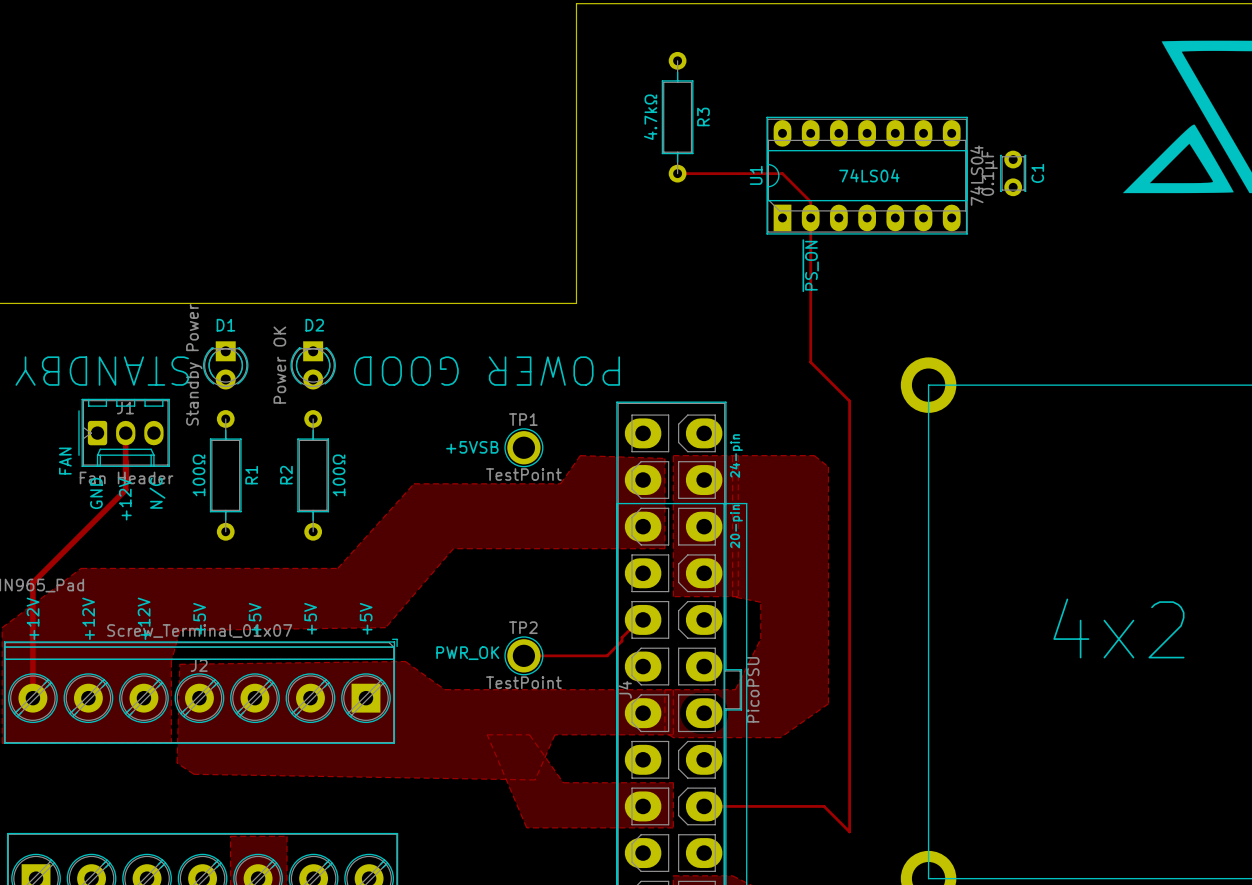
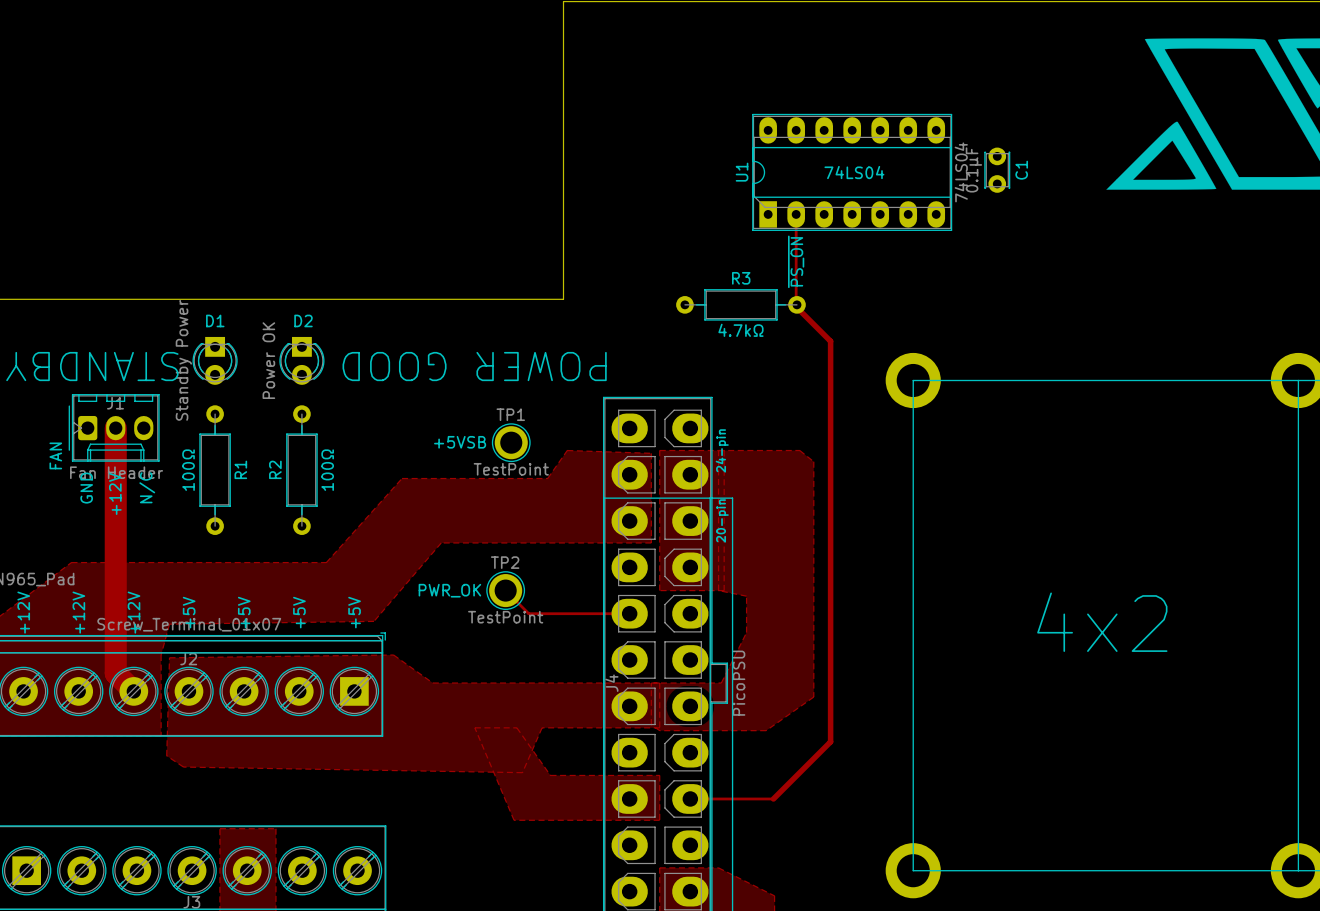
R3 name position: R3 (703, 116) -> R3 (741, 278)
R3 value position: 4.7kΩ (650, 117) -> 4.7kΩ (740, 330)
R3 rotation: 0° (677, 117) -> 90° clockwise (740, 304)
R3 position: (677, 117) -> (740, 304)
track: (677, 173) (782, 173) (810, 201) (810, 217) -> none
track: (810, 310) (810, 362) (849, 401) (849, 831) (824, 806) (787, 806) -> (796, 306) (830, 341) (830, 741) (773, 798)
track width: thin (125, 433) (125, 489) -> thick (115, 428) (115, 484)
track: (125, 489) (32, 582) (32, 698) -> (115, 484) (115, 673) (133, 691)
track: (639, 619) (607, 655) (523, 655) (525, 654) -> (626, 613) (528, 613) (505, 590)
text position: PWR_OK (467, 653) -> PWR_OK (449, 590)
TP2 position: (523, 655) -> (505, 590)

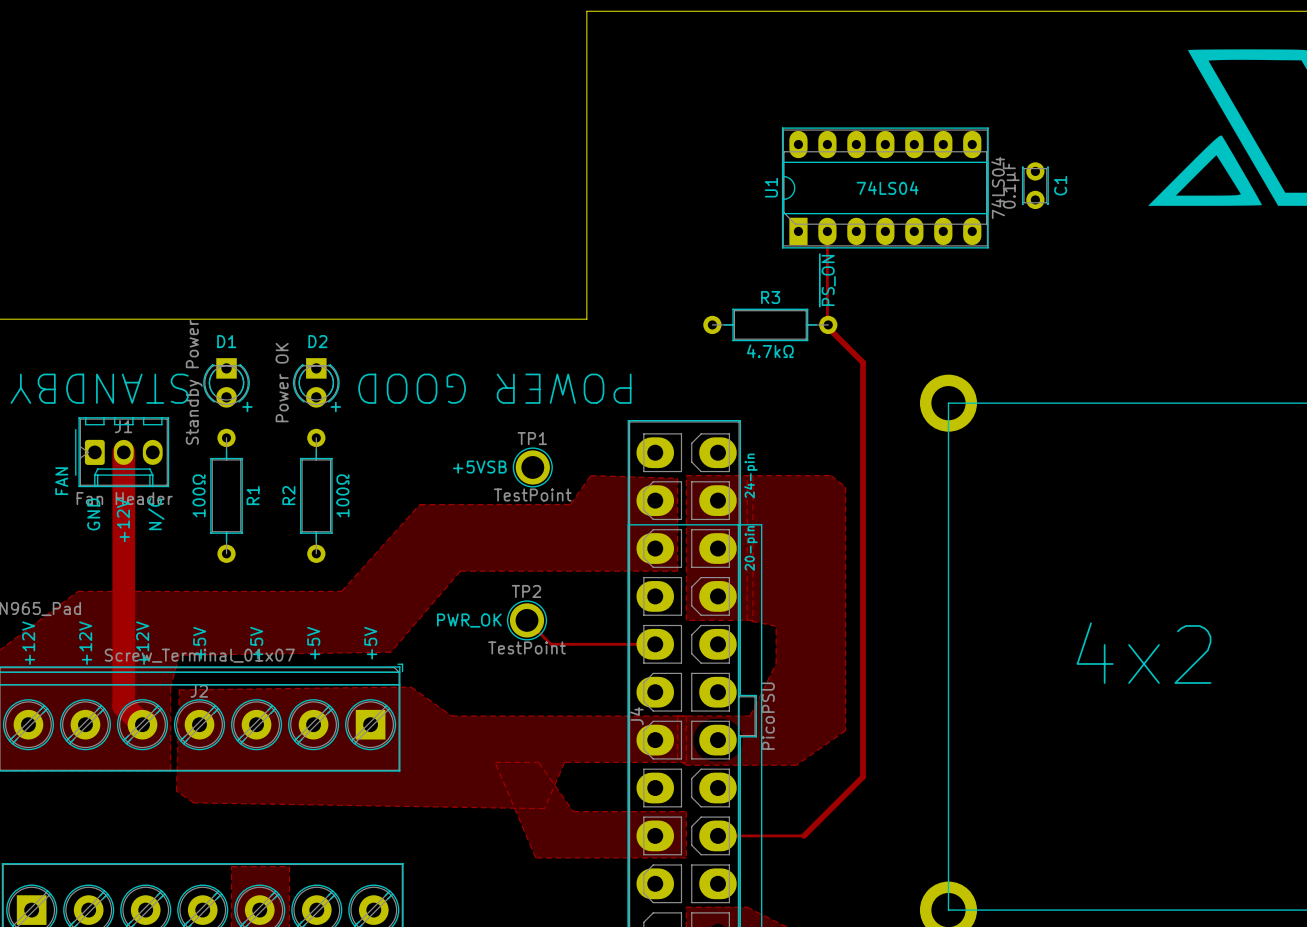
text: none -> + (247, 406)
text: none -> + (335, 406)

